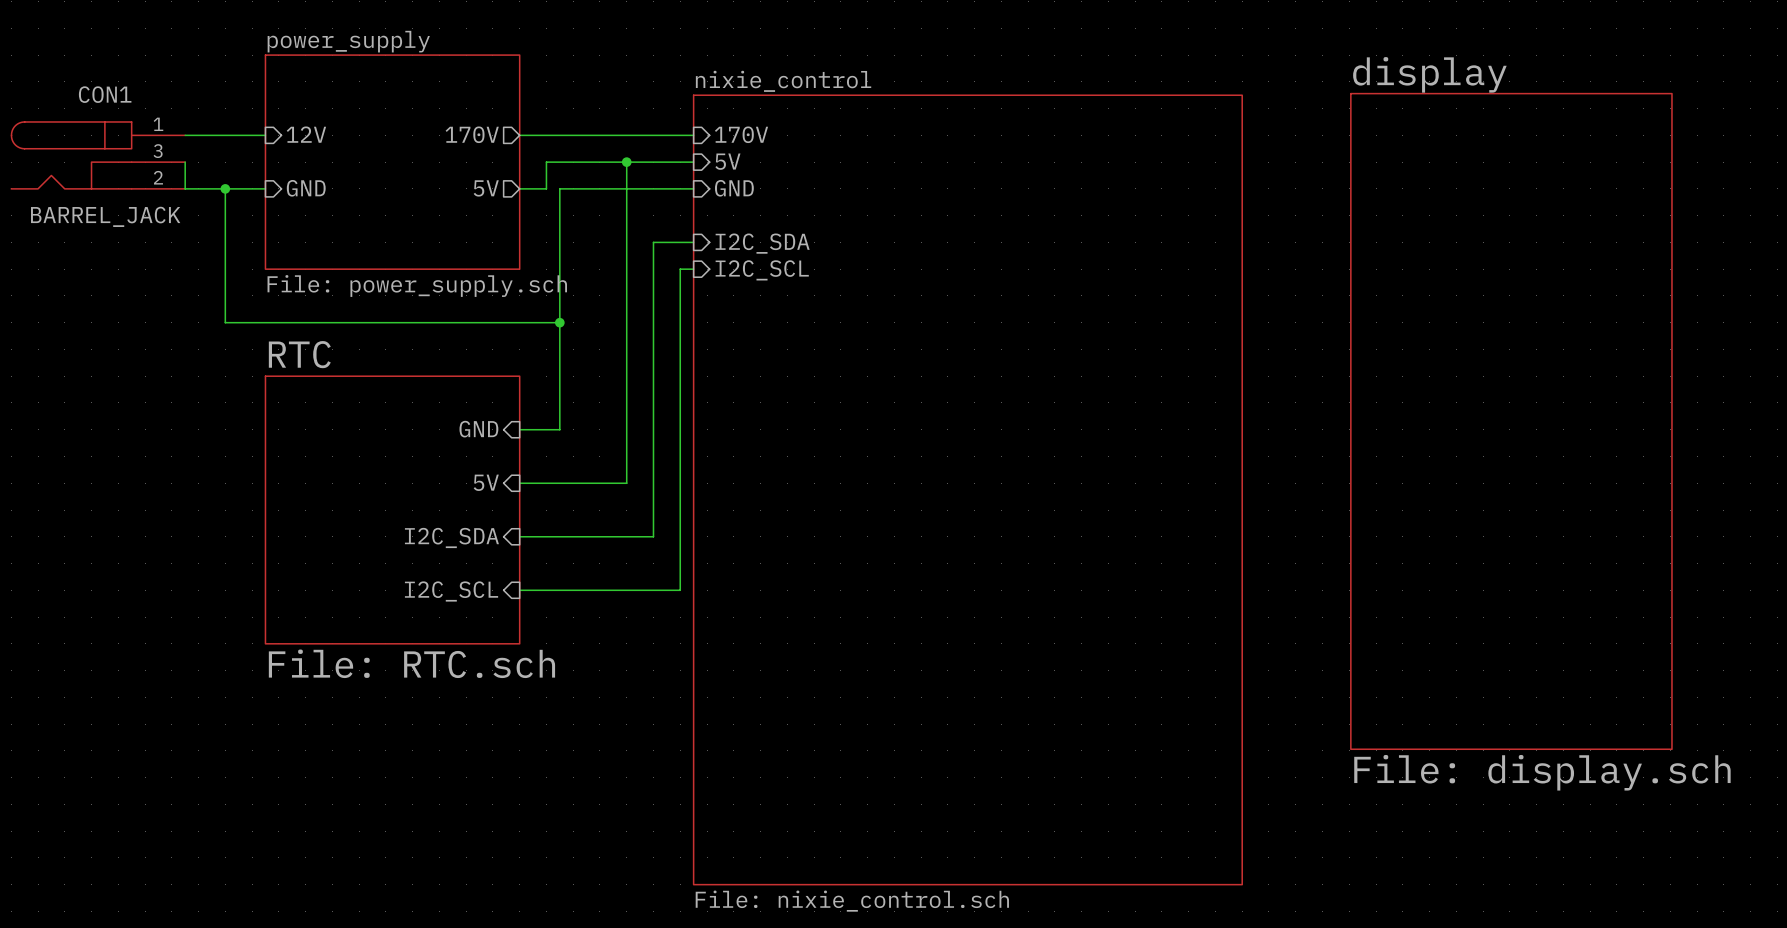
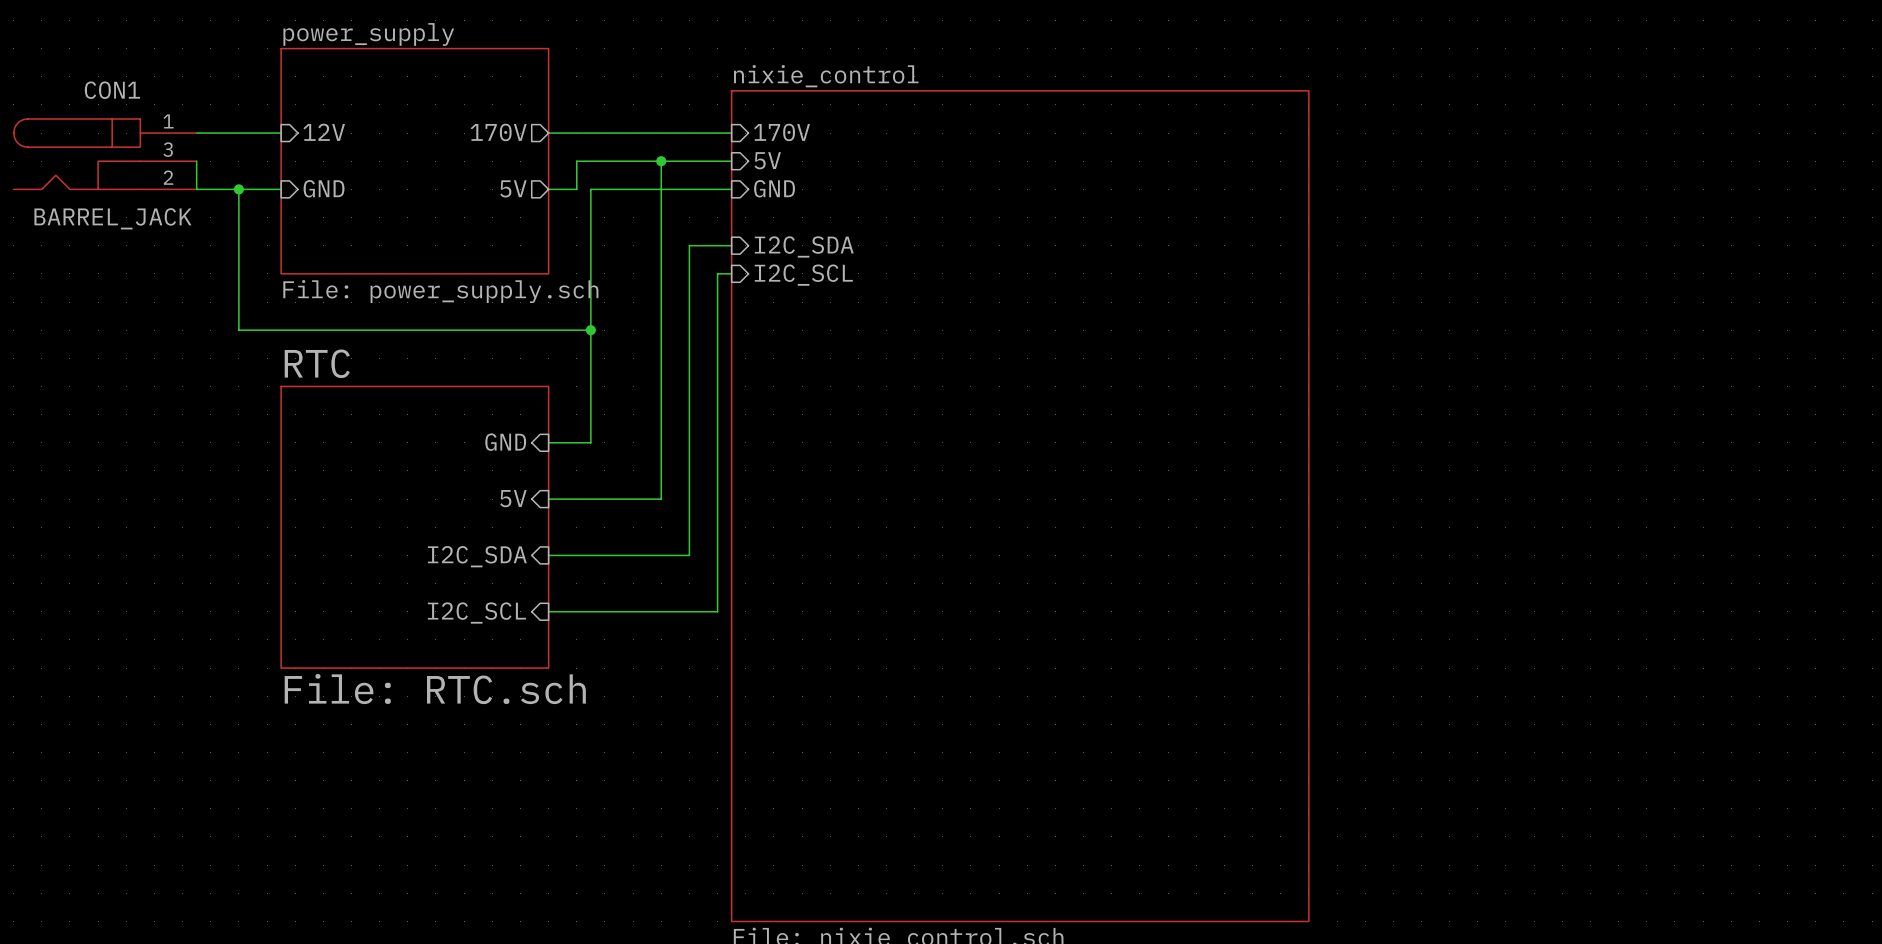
sheet display: File: display.sch (1511, 421) -> none

